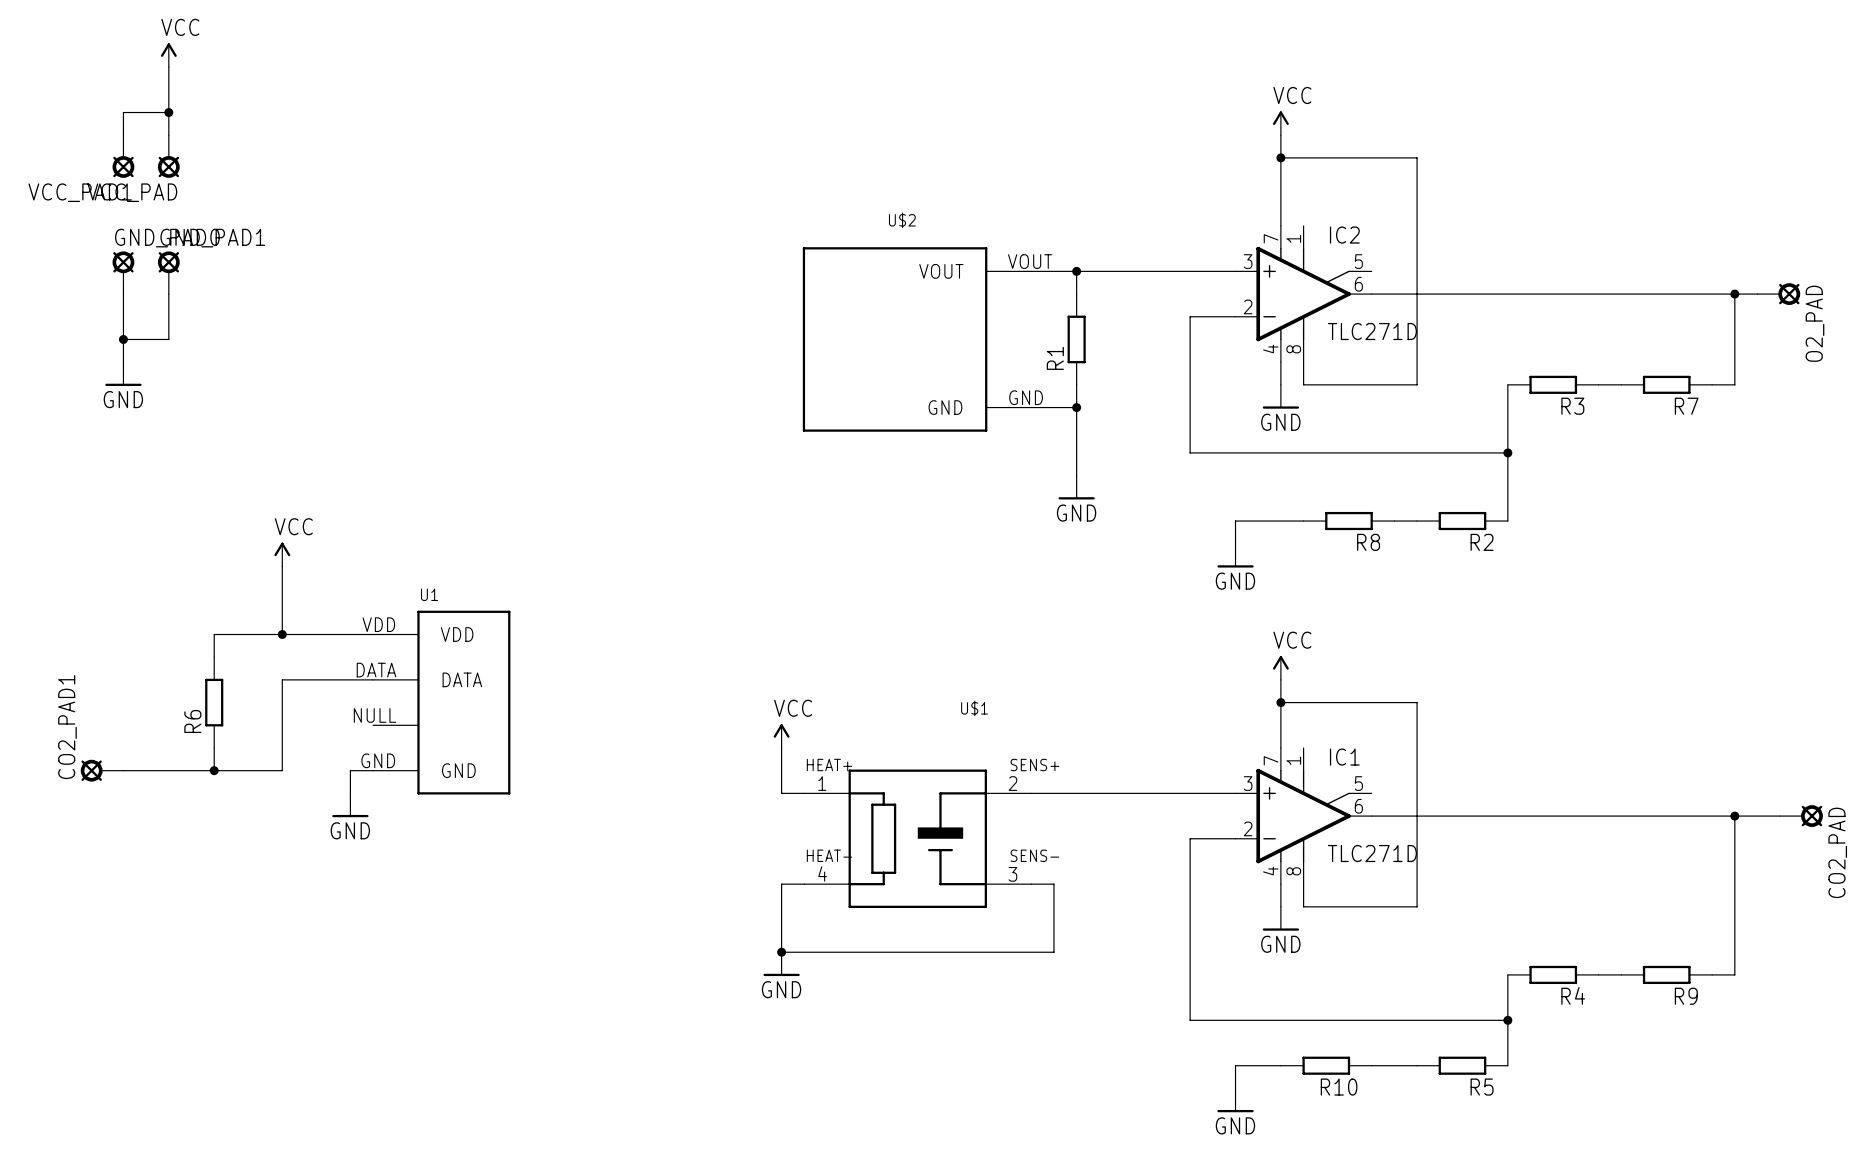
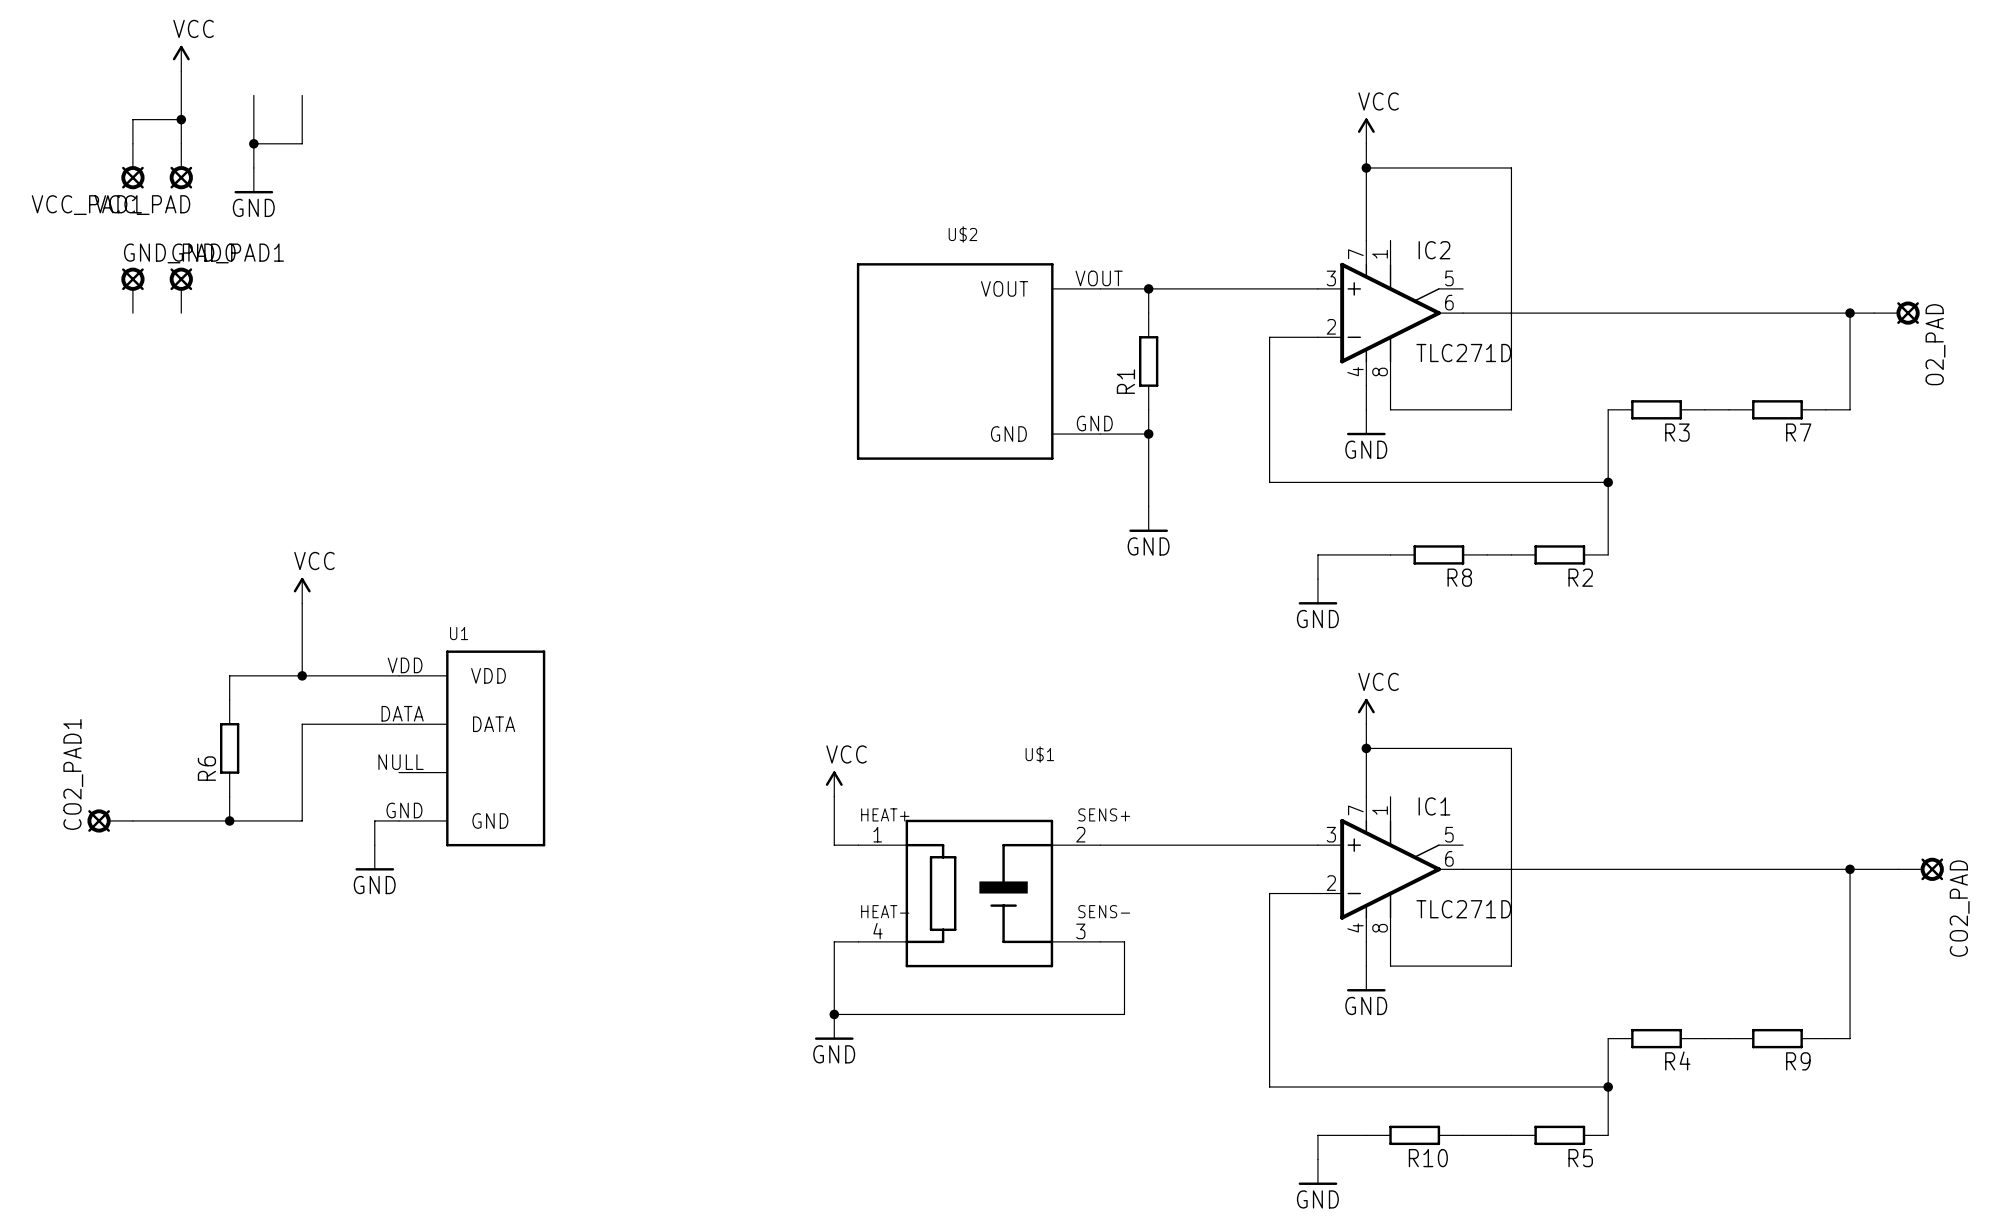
wire: none -> (253, 95) (253, 167)
wire: none -> (302, 95) (302, 143) (253, 143)
junction: none -> (253, 143)
power symbol: none -> GND (253, 180)
wire: (123, 294) (123, 362) -> none
wire: (168, 294) (168, 339) (123, 339) -> none
junction: (123, 339) -> none
power symbol: GND (123, 374) -> none

